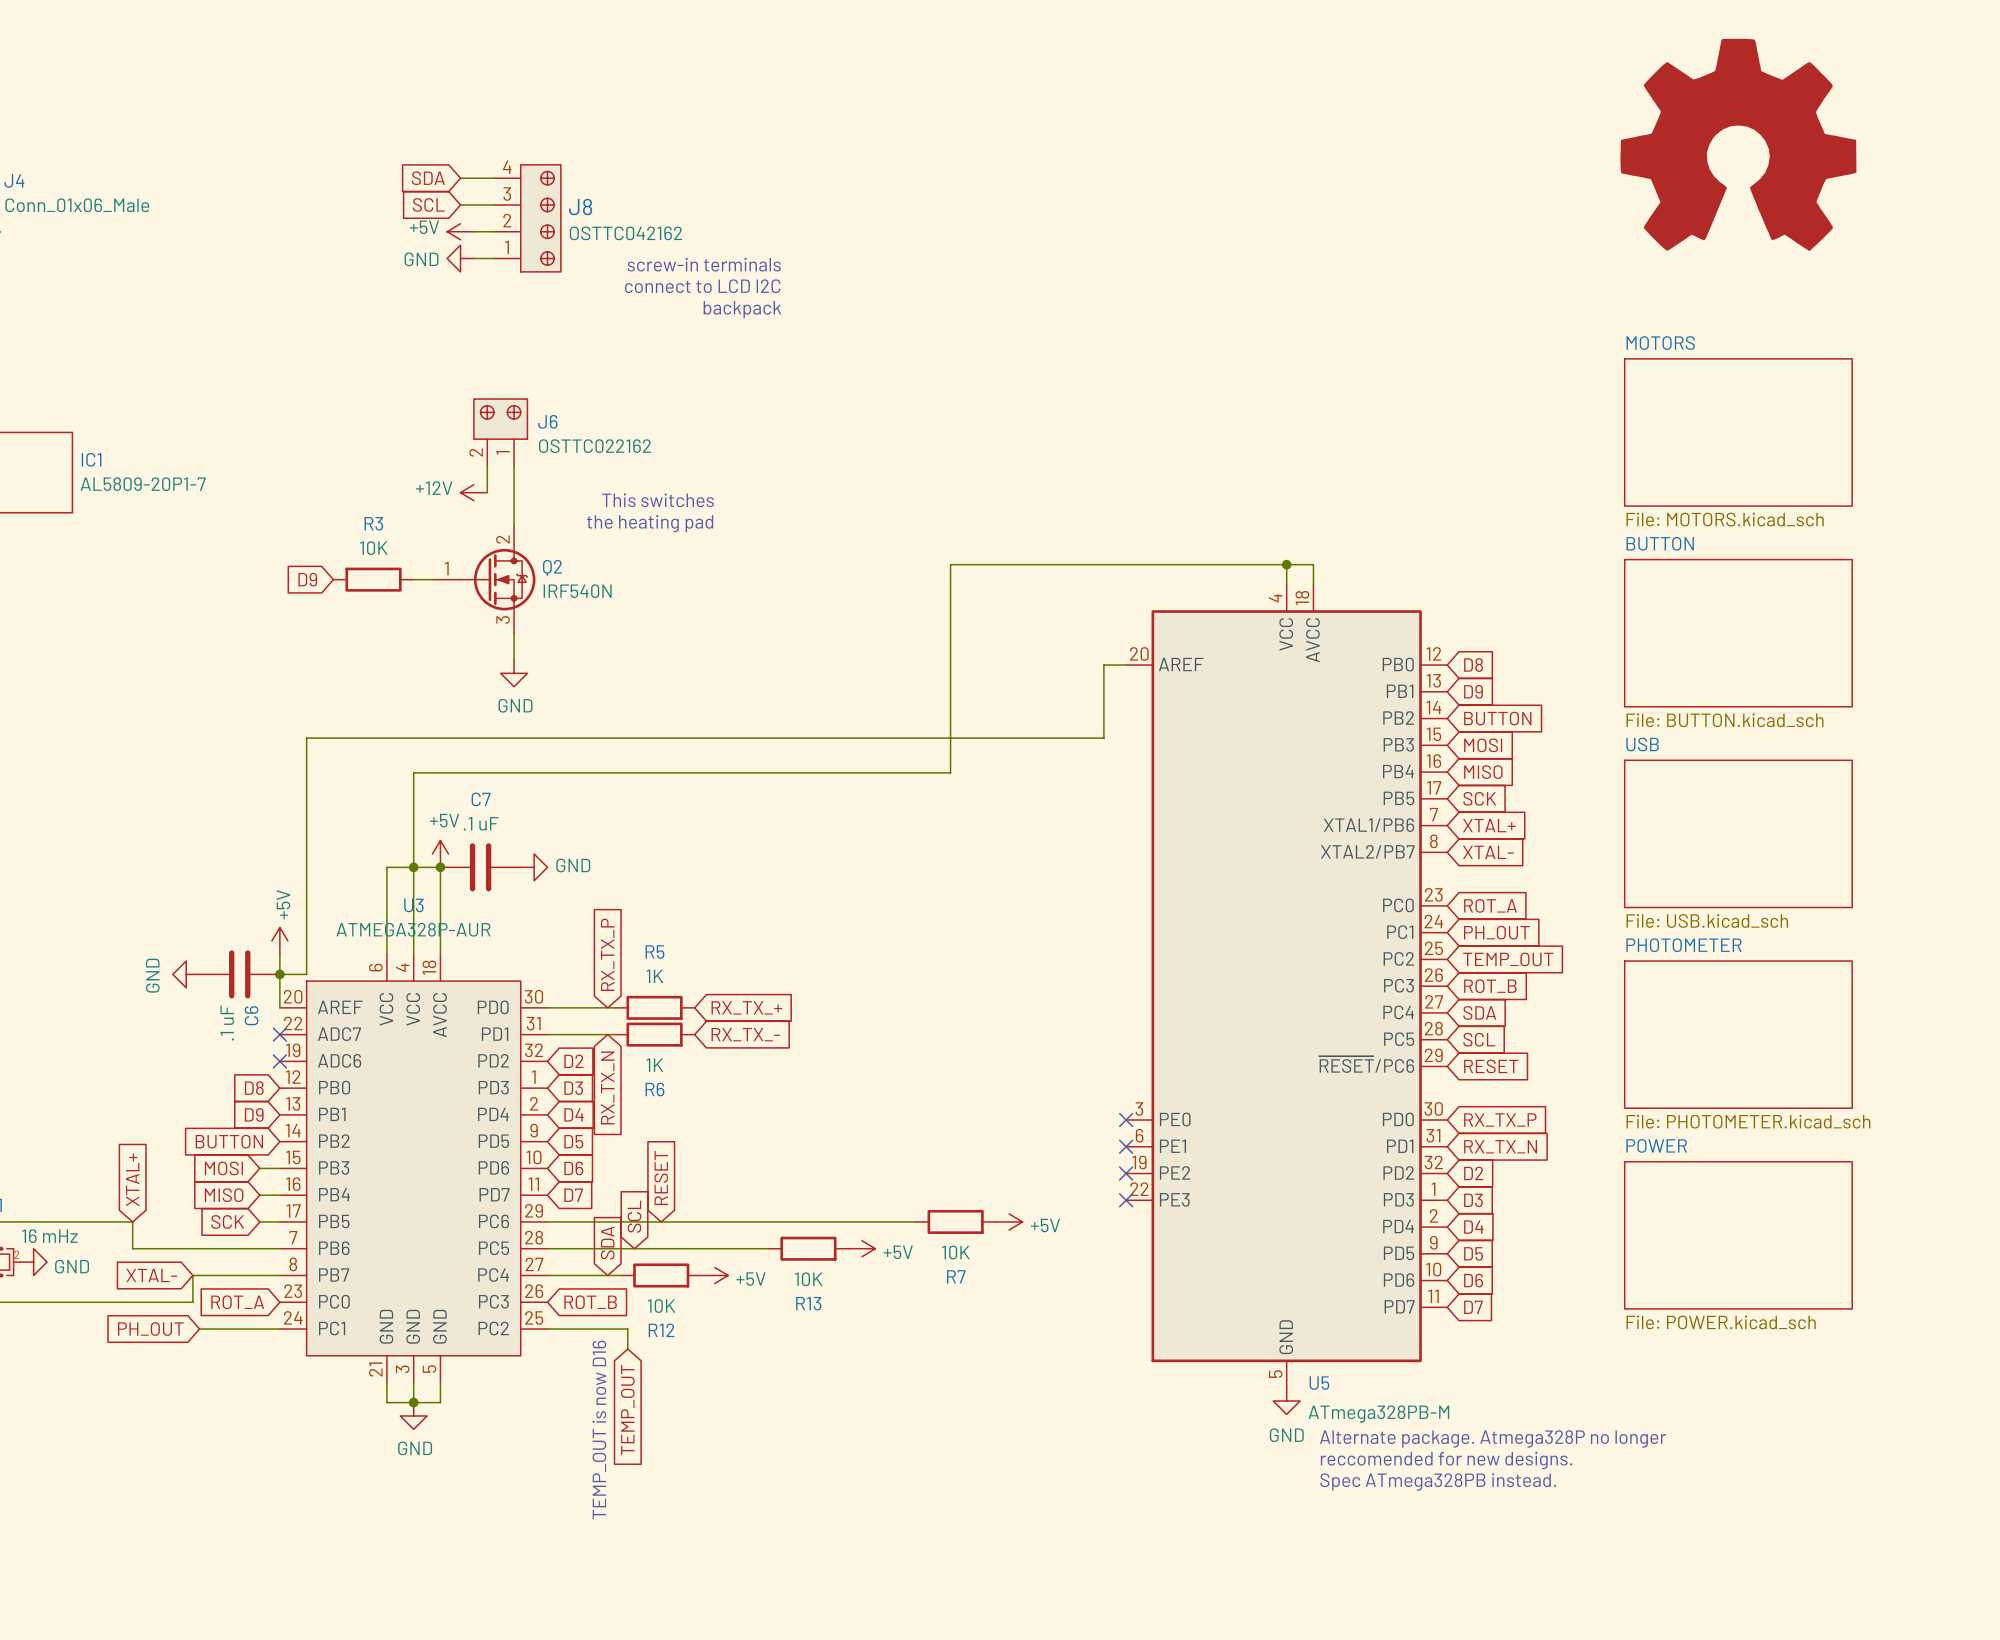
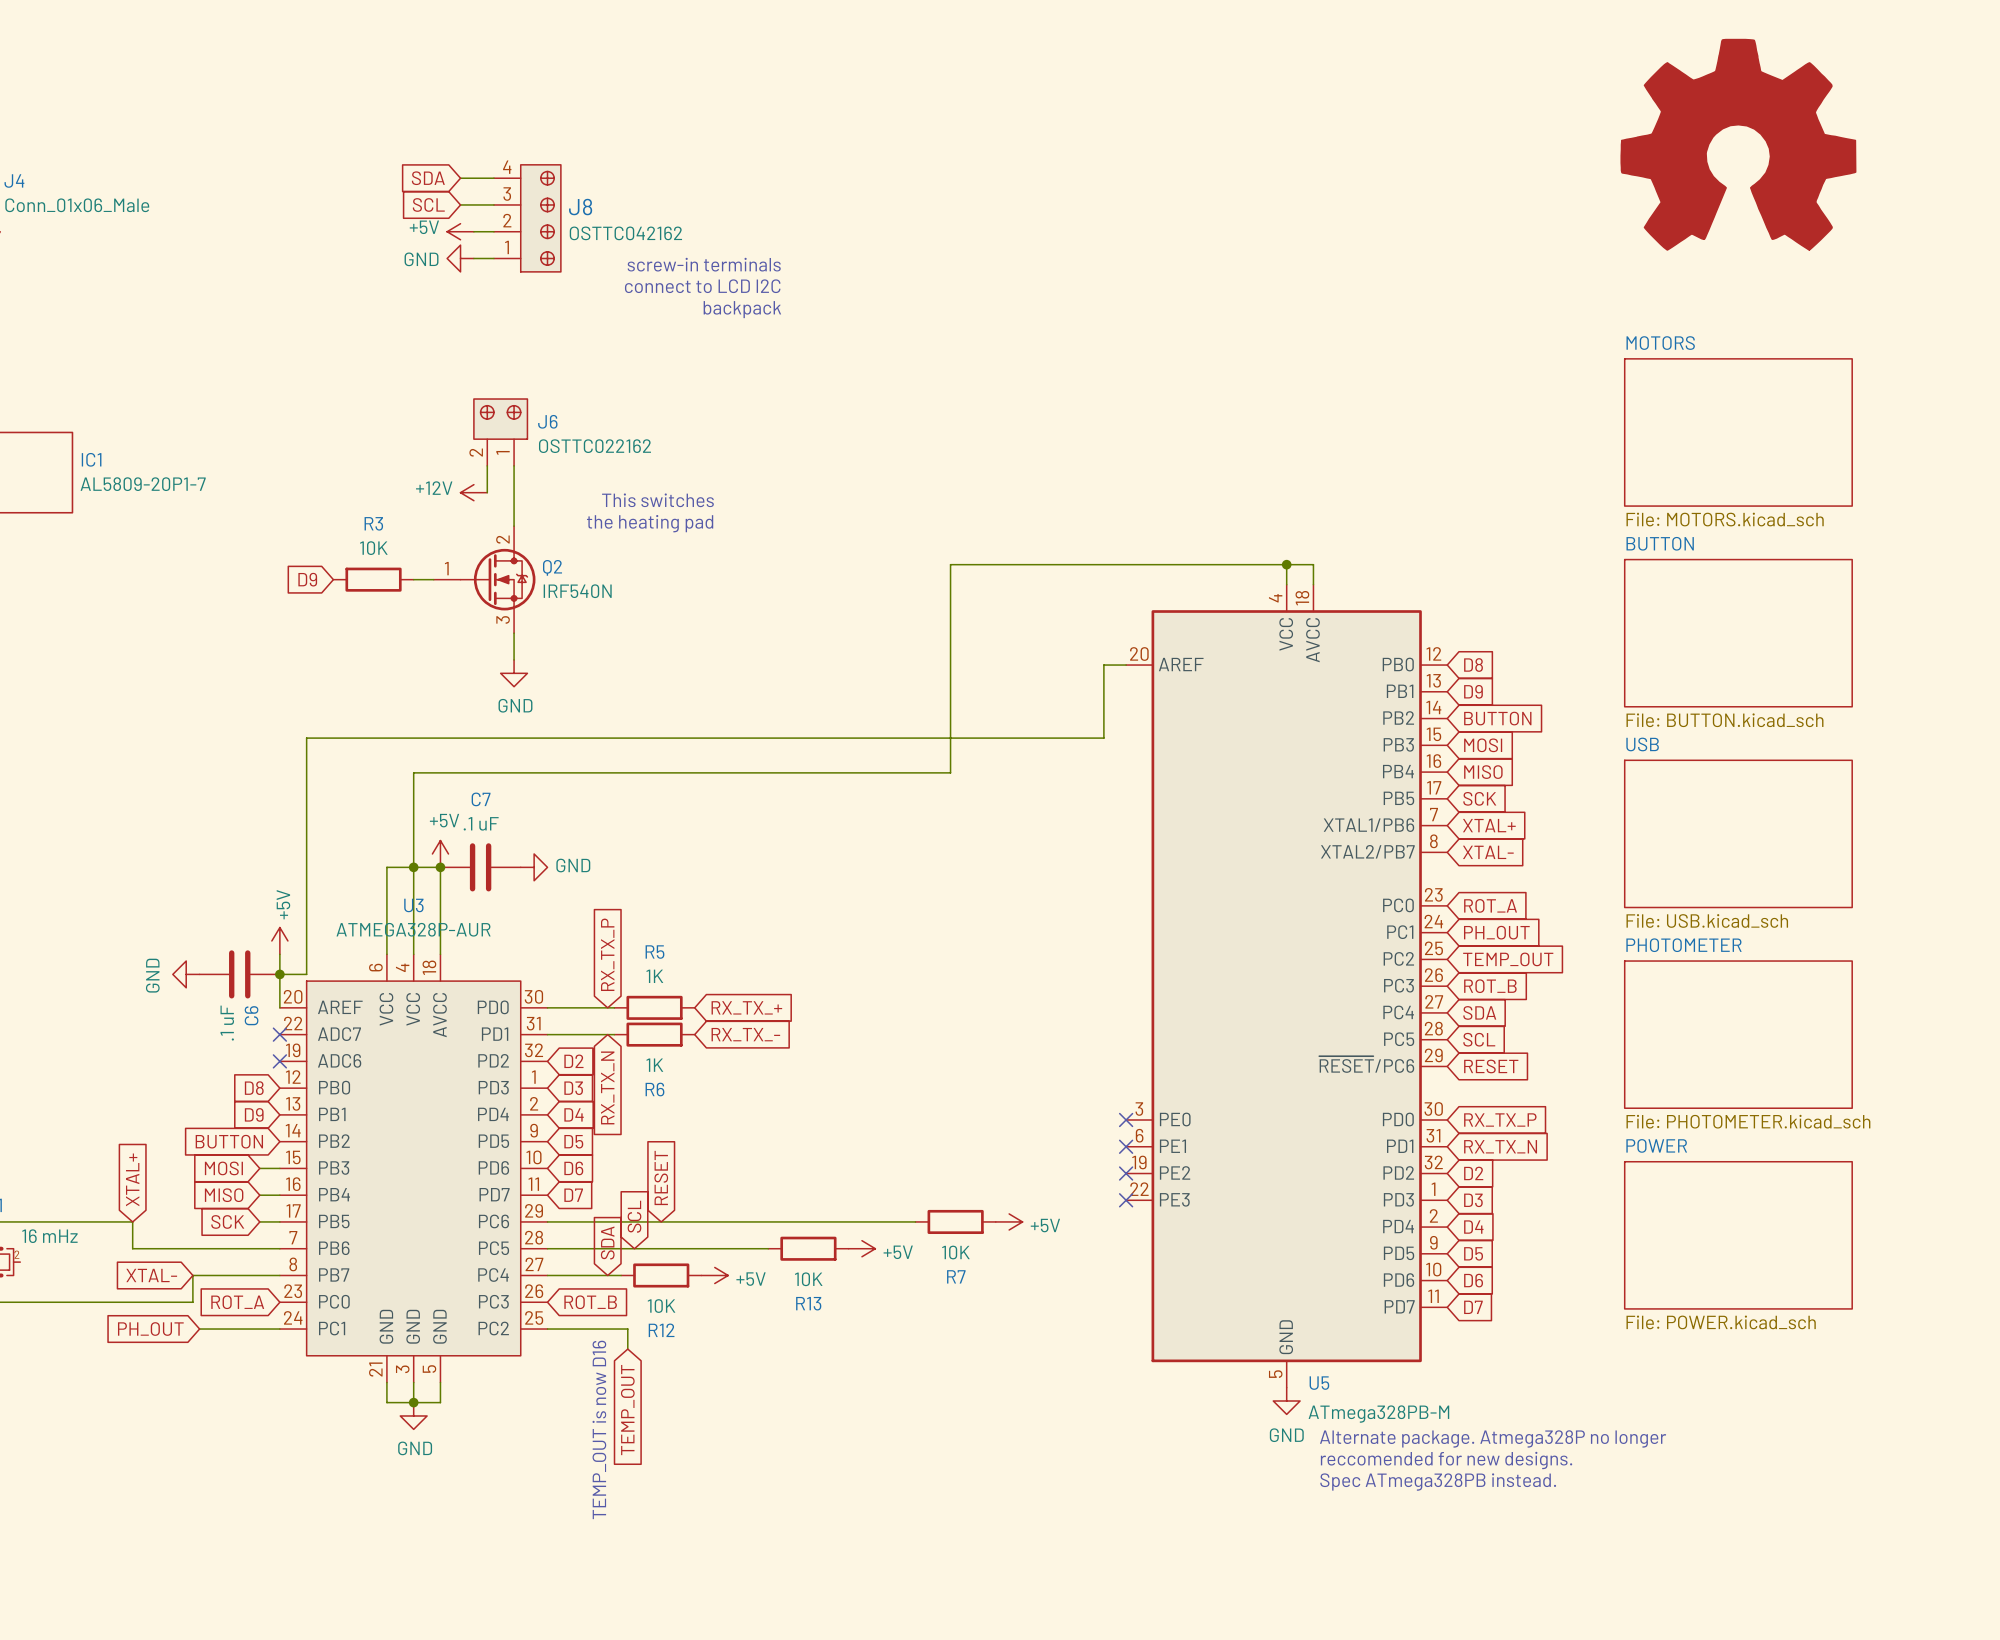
power symbol: GND (33, 1262) -> none

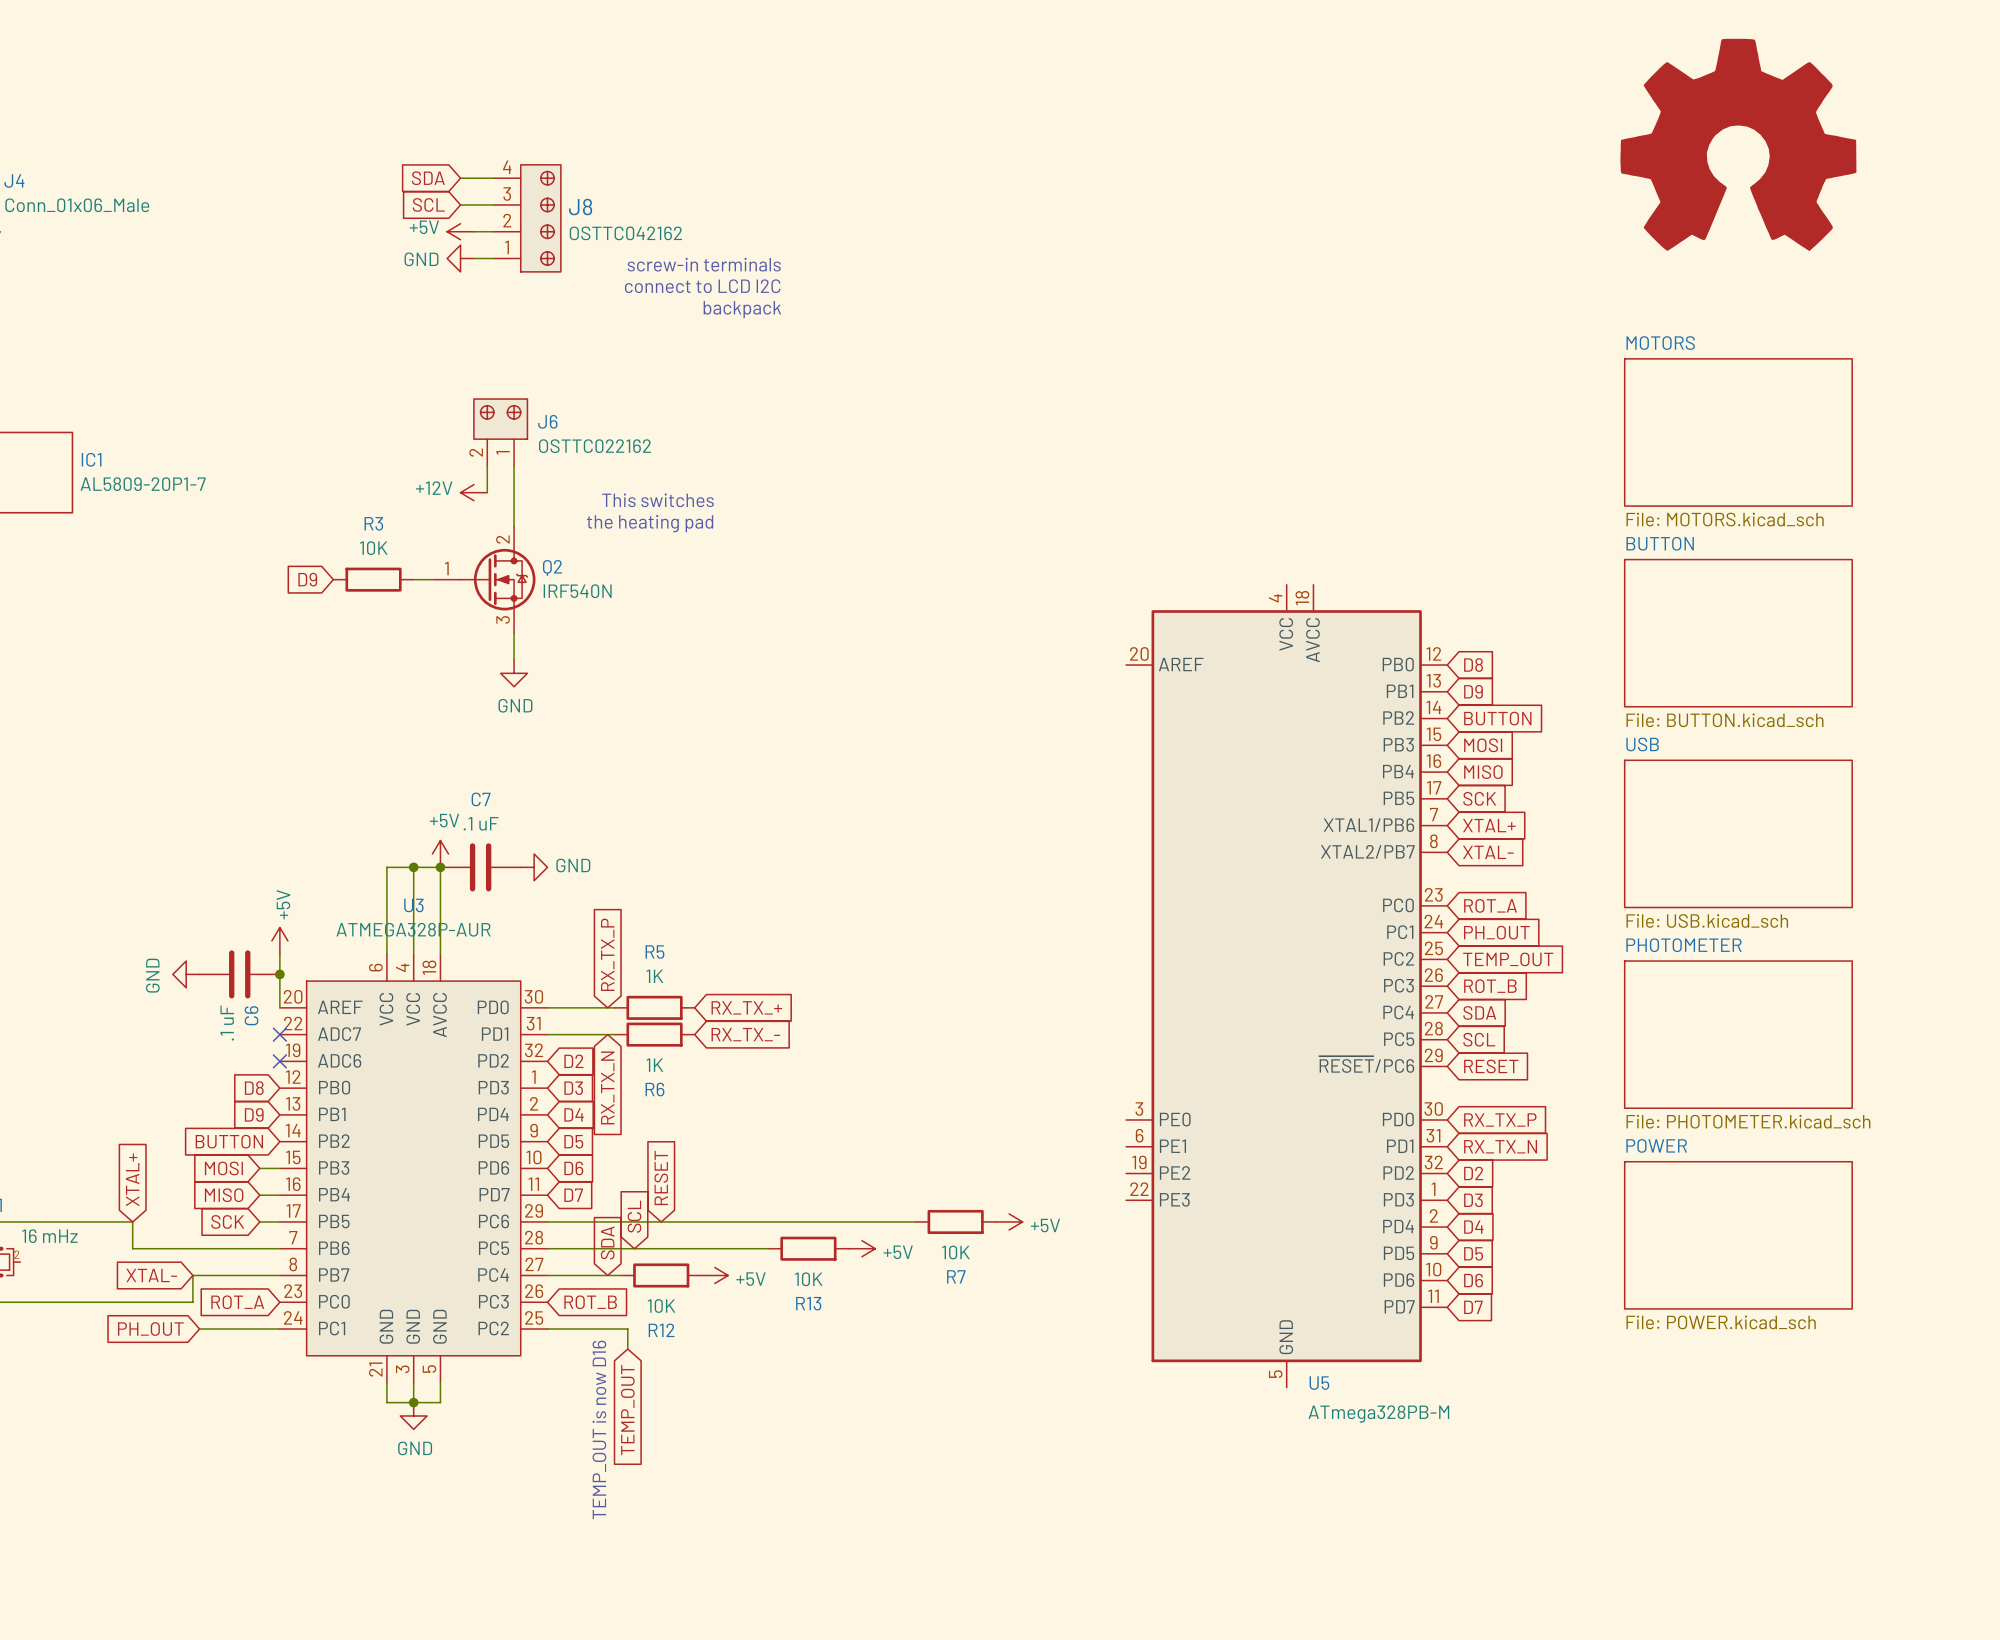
wire: (1286, 564) (1286, 584) -> none
junction: (1286, 564) -> none
wire: (1313, 584) (1313, 564) (950, 564) (950, 772) (413, 772) (413, 867) -> none
wire: (1126, 665) (1103, 665) (1103, 738) (306, 738) (306, 974) (279, 974) -> none
no-connect mark: (1126, 1119) -> none
no-connect mark: (1126, 1146) -> none
no-connect mark: (1126, 1173) -> none
no-connect mark: (1126, 1200) -> none
power symbol: GND (1286, 1401) -> none
text: Alternate package. Atmega328P no longer (1493, 1438) -> none
text: reccomended for new designs. (1446, 1460) -> none
text: Spec ATmega328PB instead. (1438, 1482) -> none

